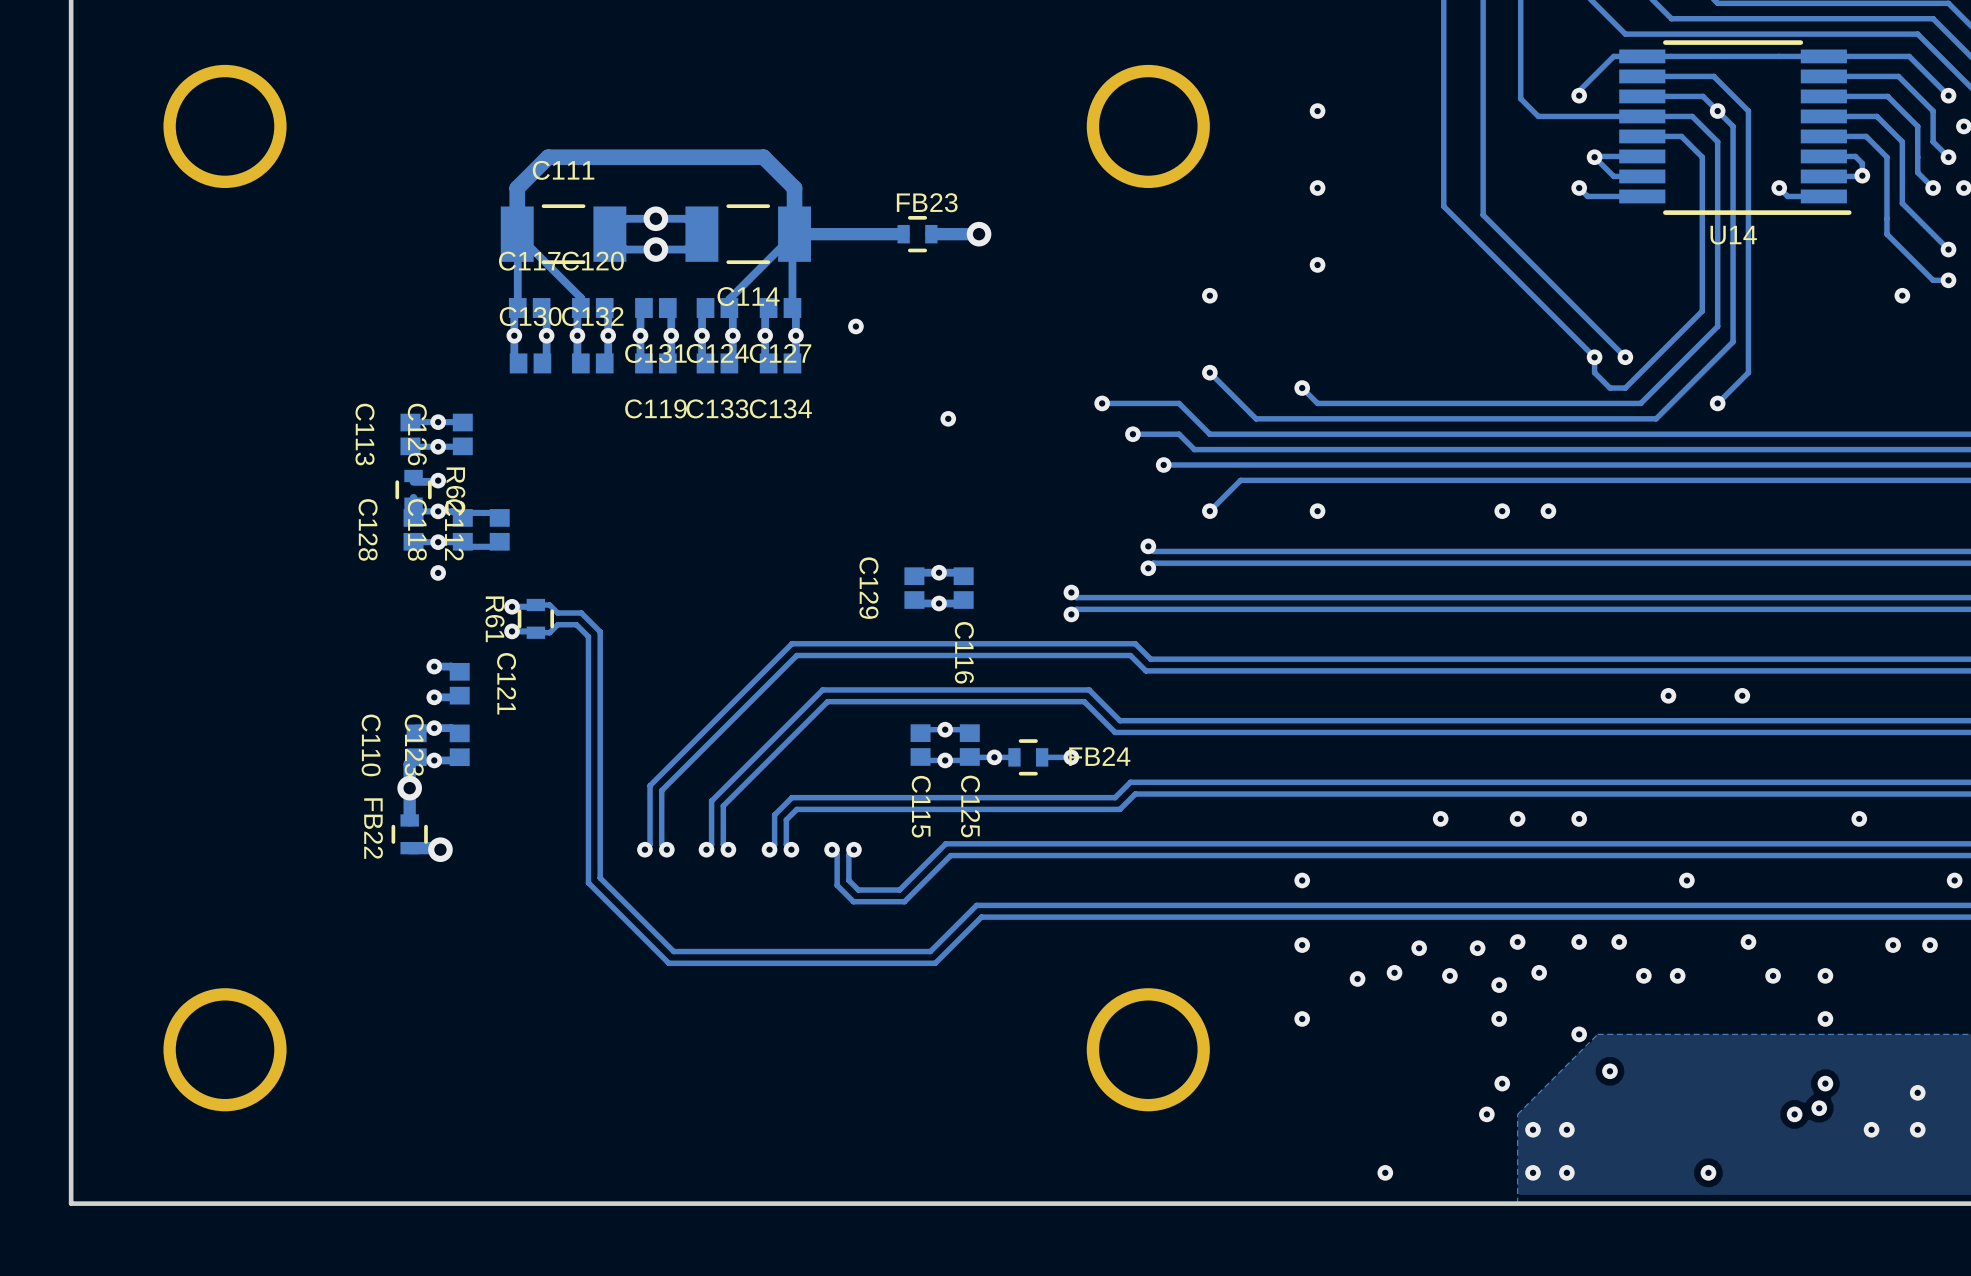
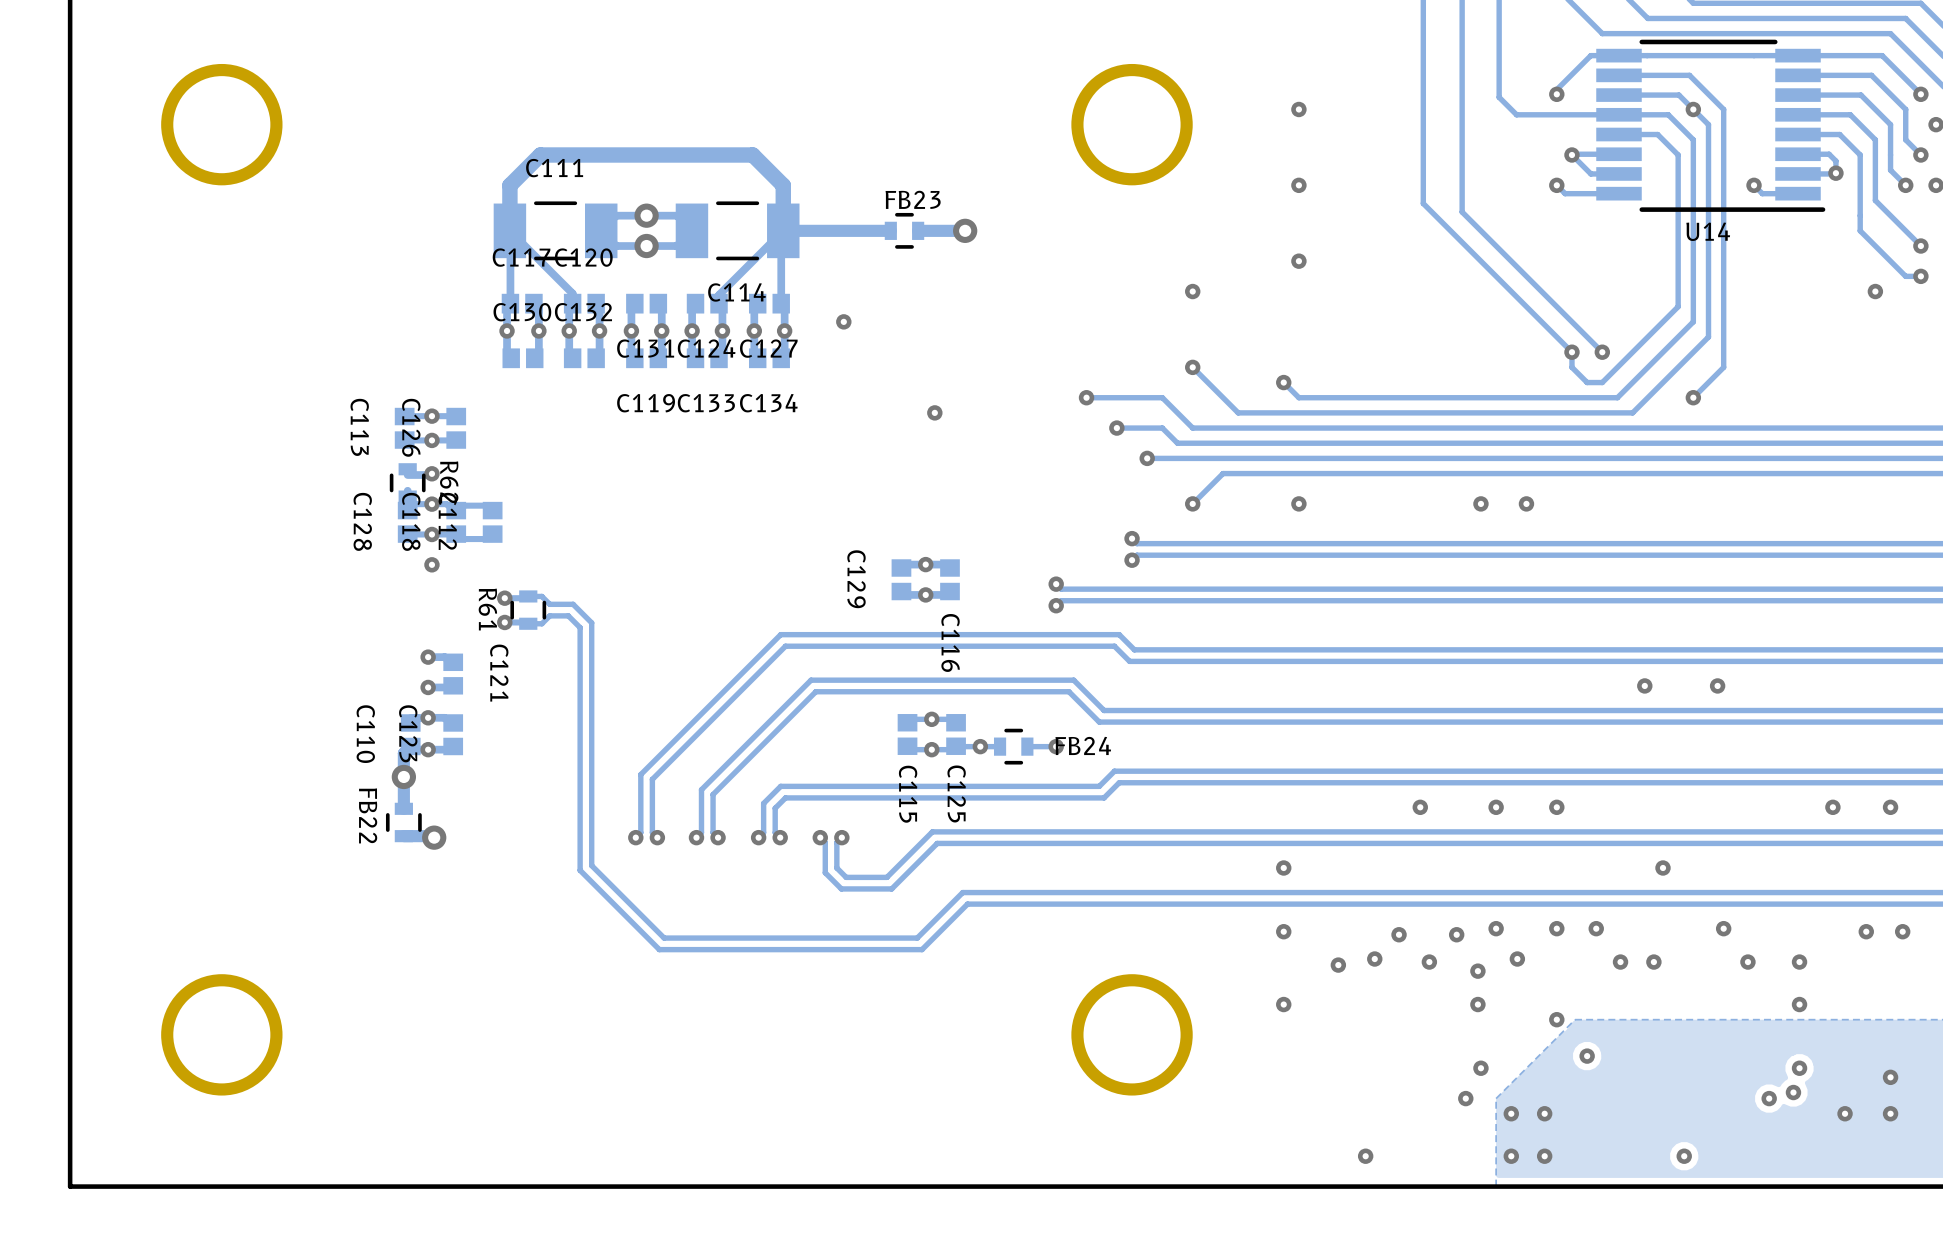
via position: (1954, 880) -> (1890, 807)

